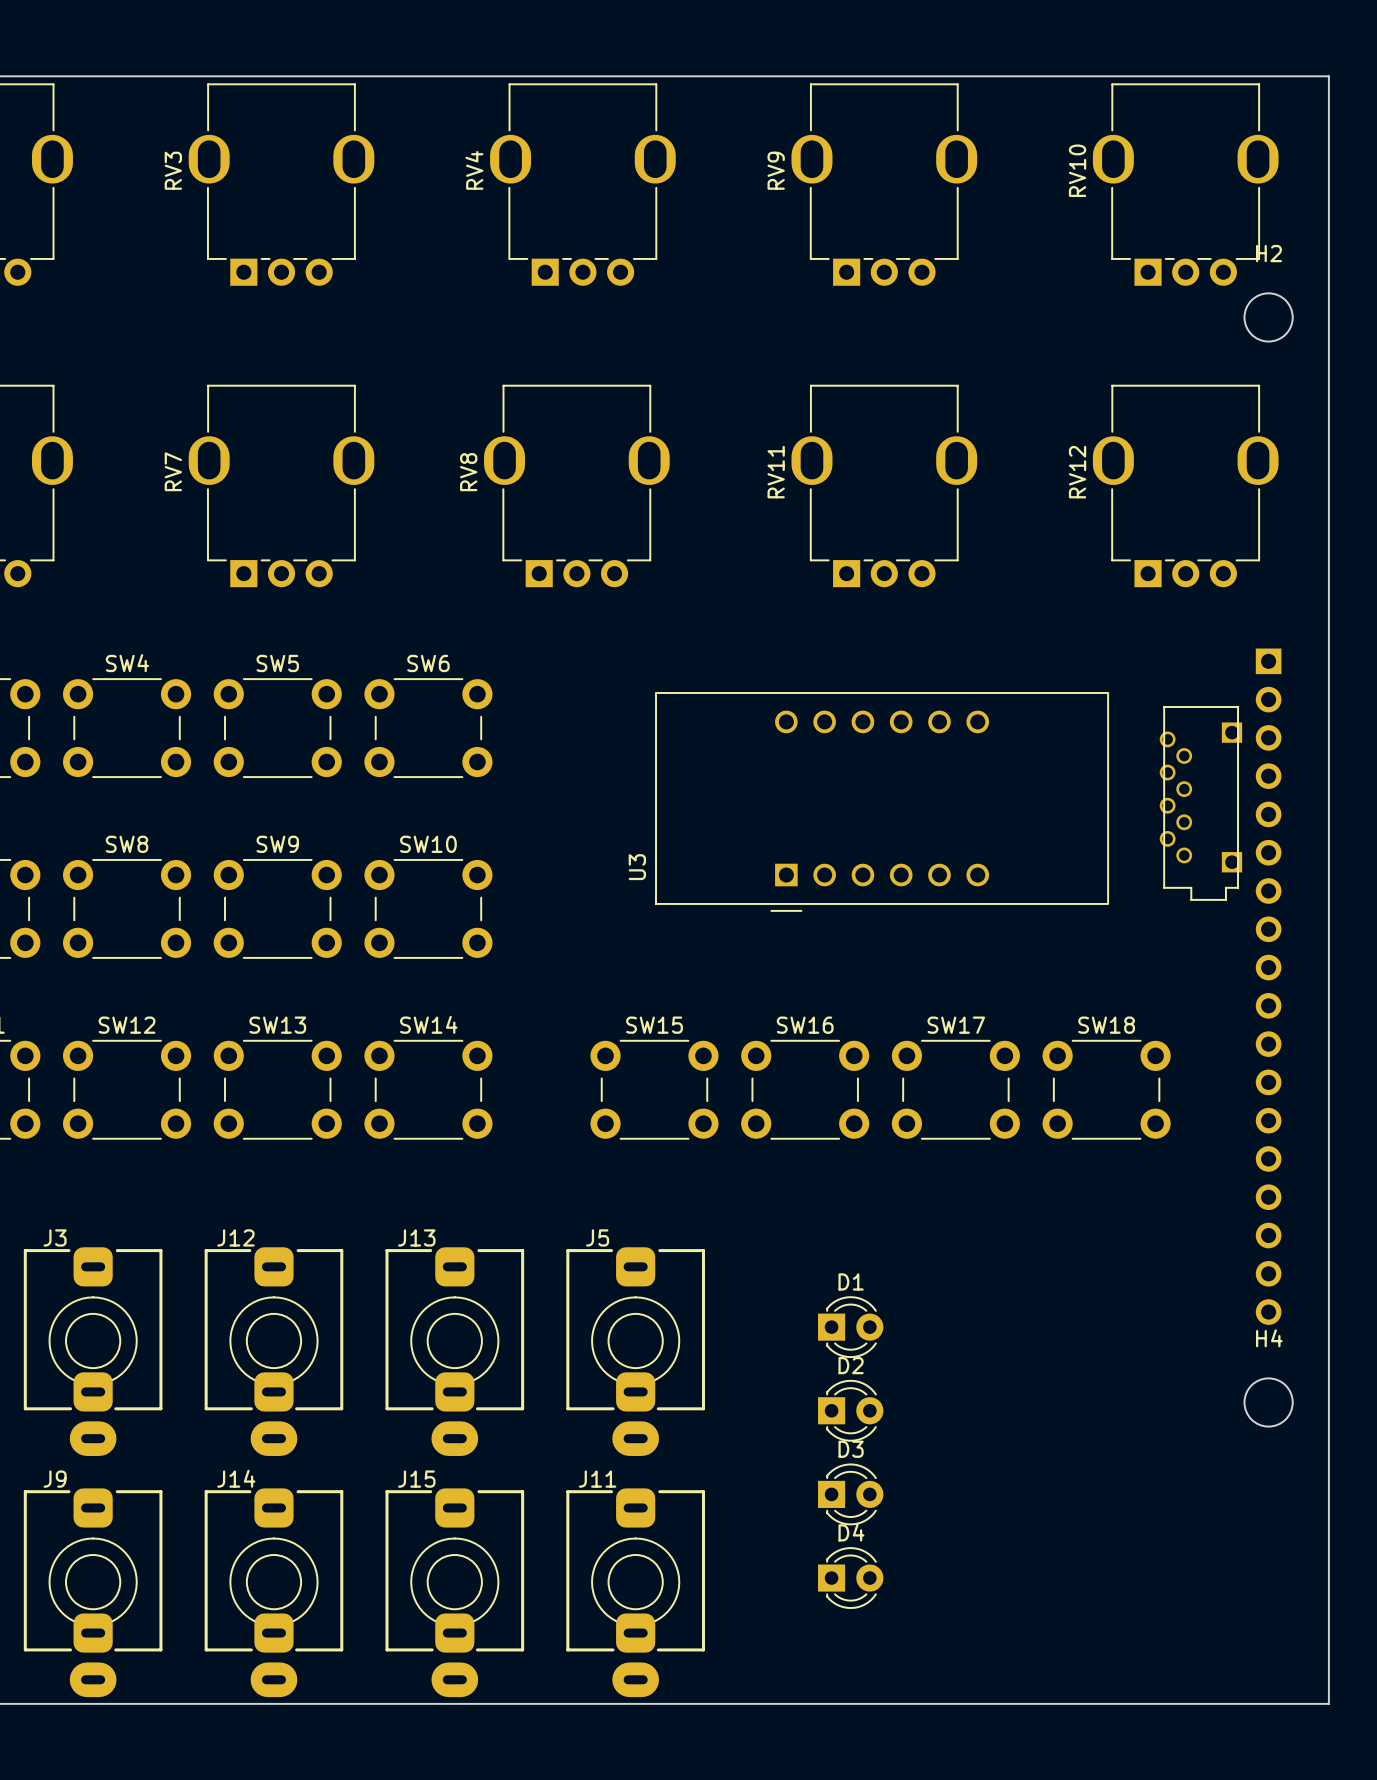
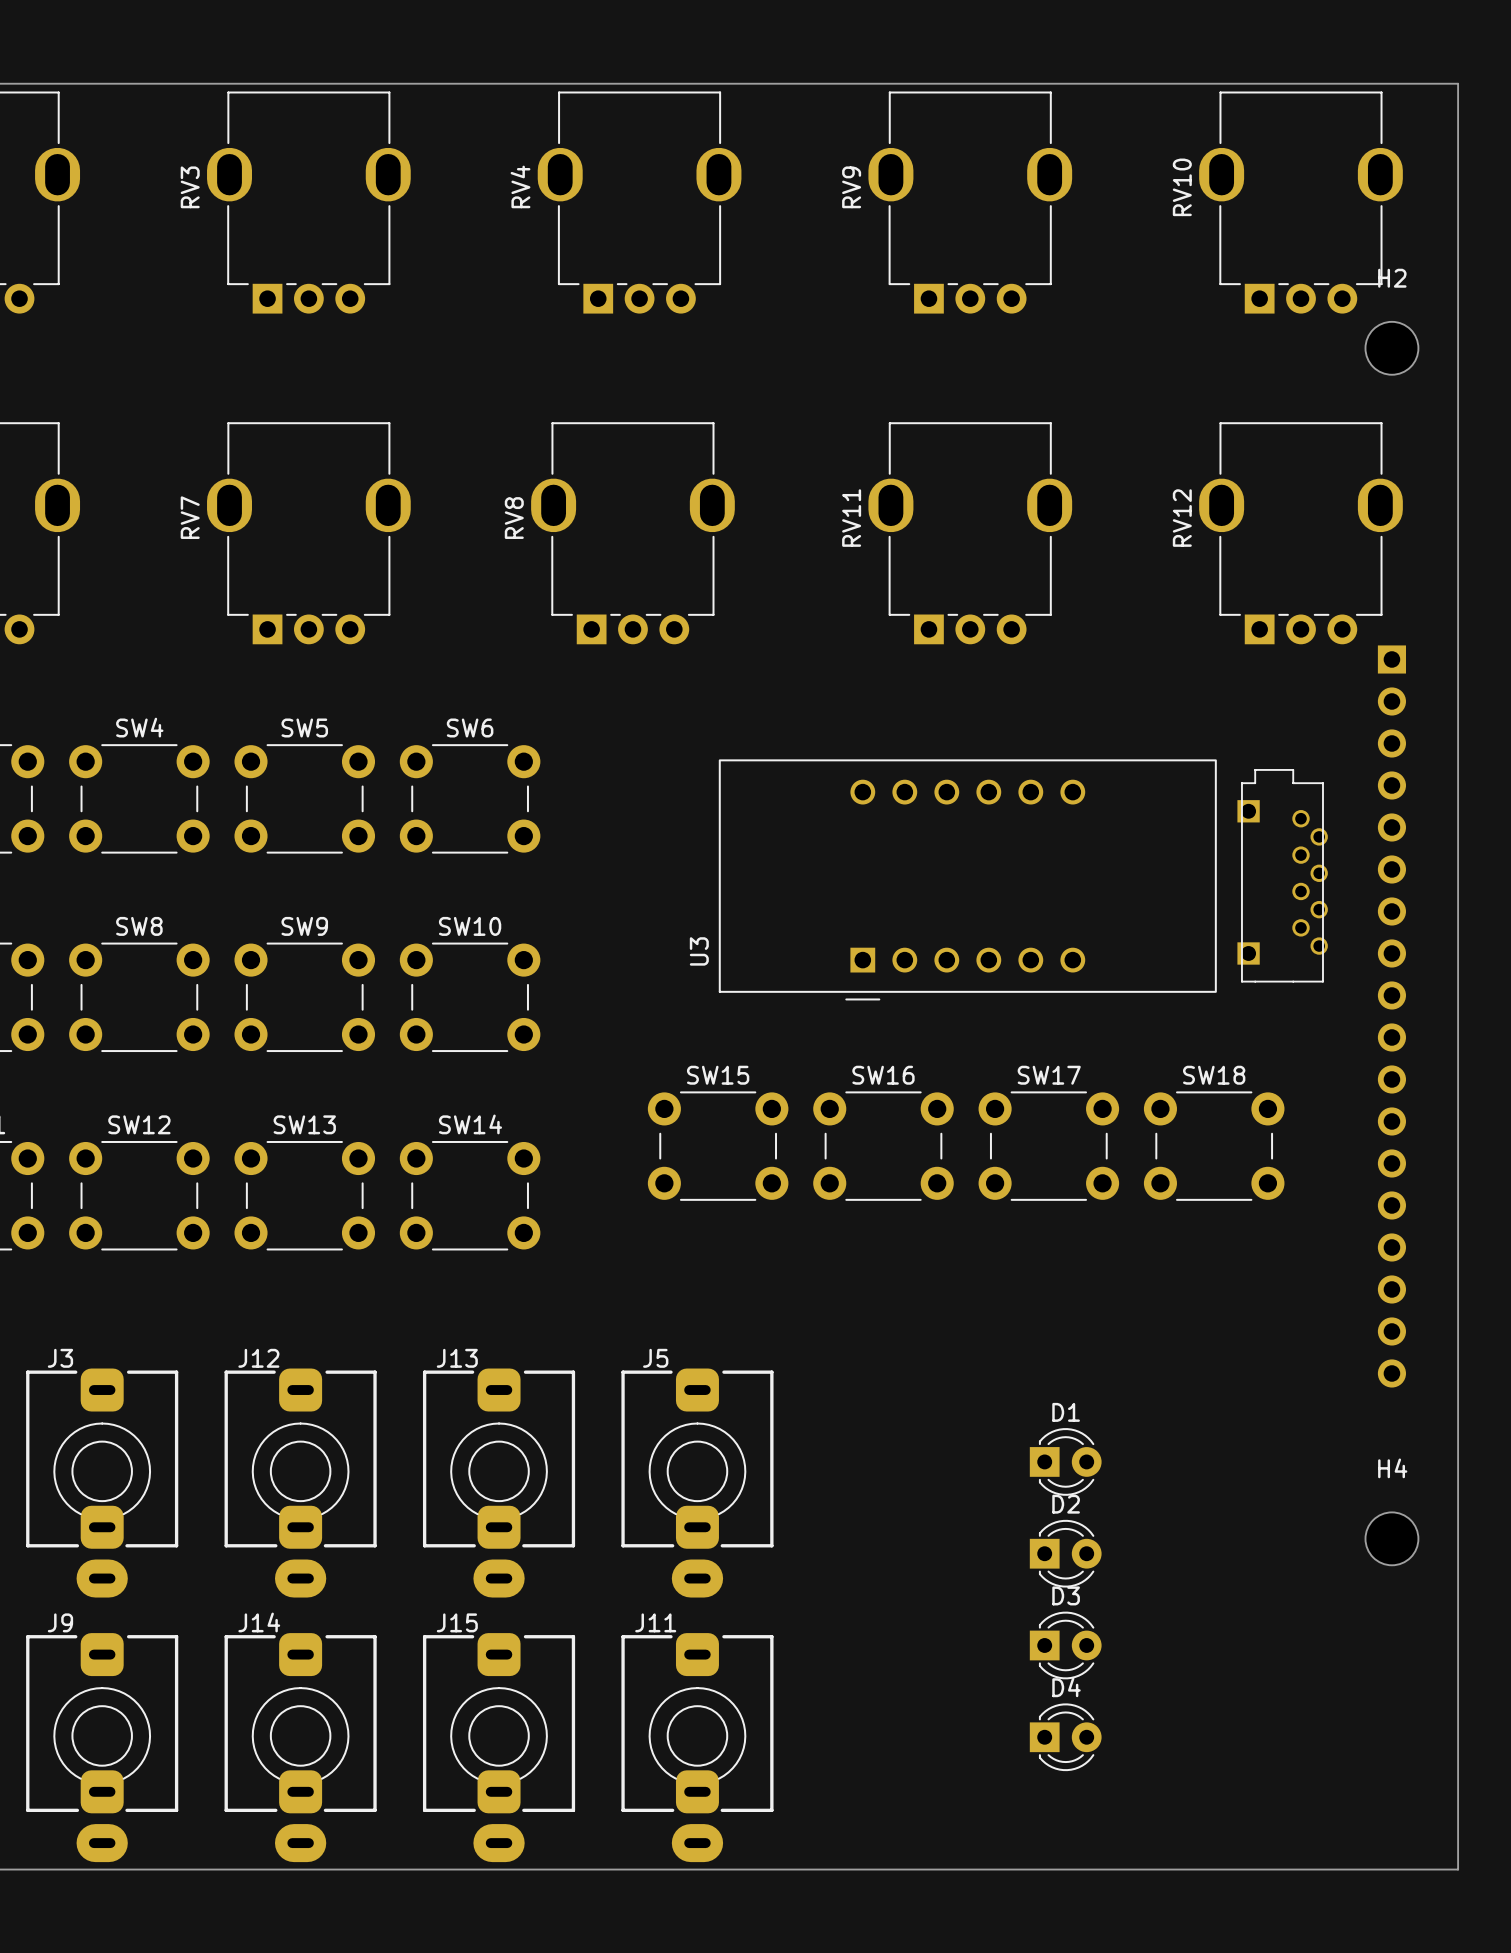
part rotation: 0° (1200, 803) -> 180° (1282, 875)
part position: (1268, 986) -> (1391, 1016)
SW15 position: (654, 1089) -> (718, 1146)
SW16 position: (805, 1089) -> (883, 1146)
SW17 position: (955, 1089) -> (1048, 1146)
SW18 position: (1106, 1089) -> (1214, 1146)
D1 position: (850, 1327) -> (1065, 1461)
D2 position: (850, 1410) -> (1065, 1553)
D3 position: (850, 1494) -> (1065, 1645)
D4 position: (850, 1578) -> (1065, 1737)

